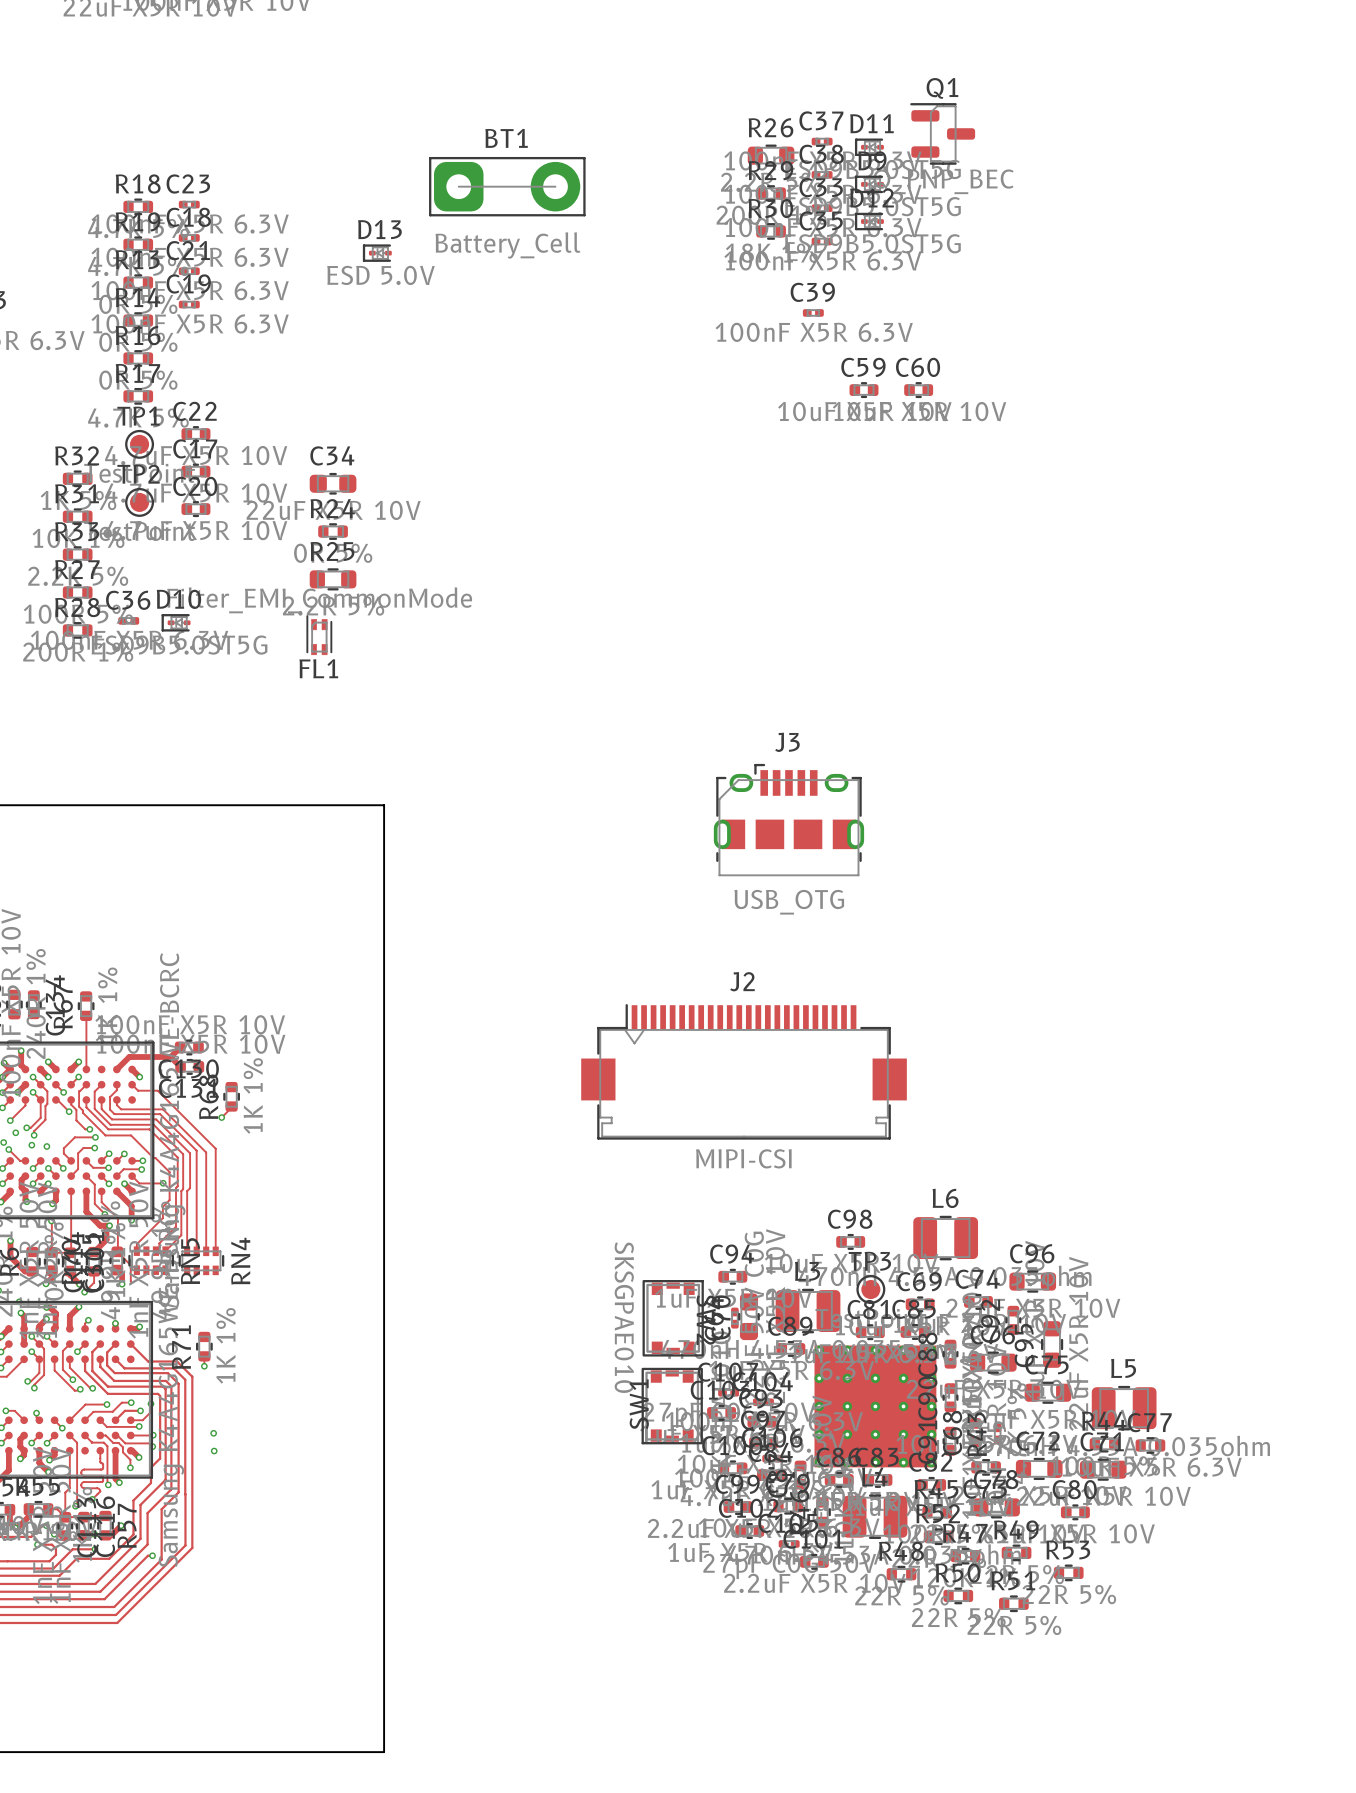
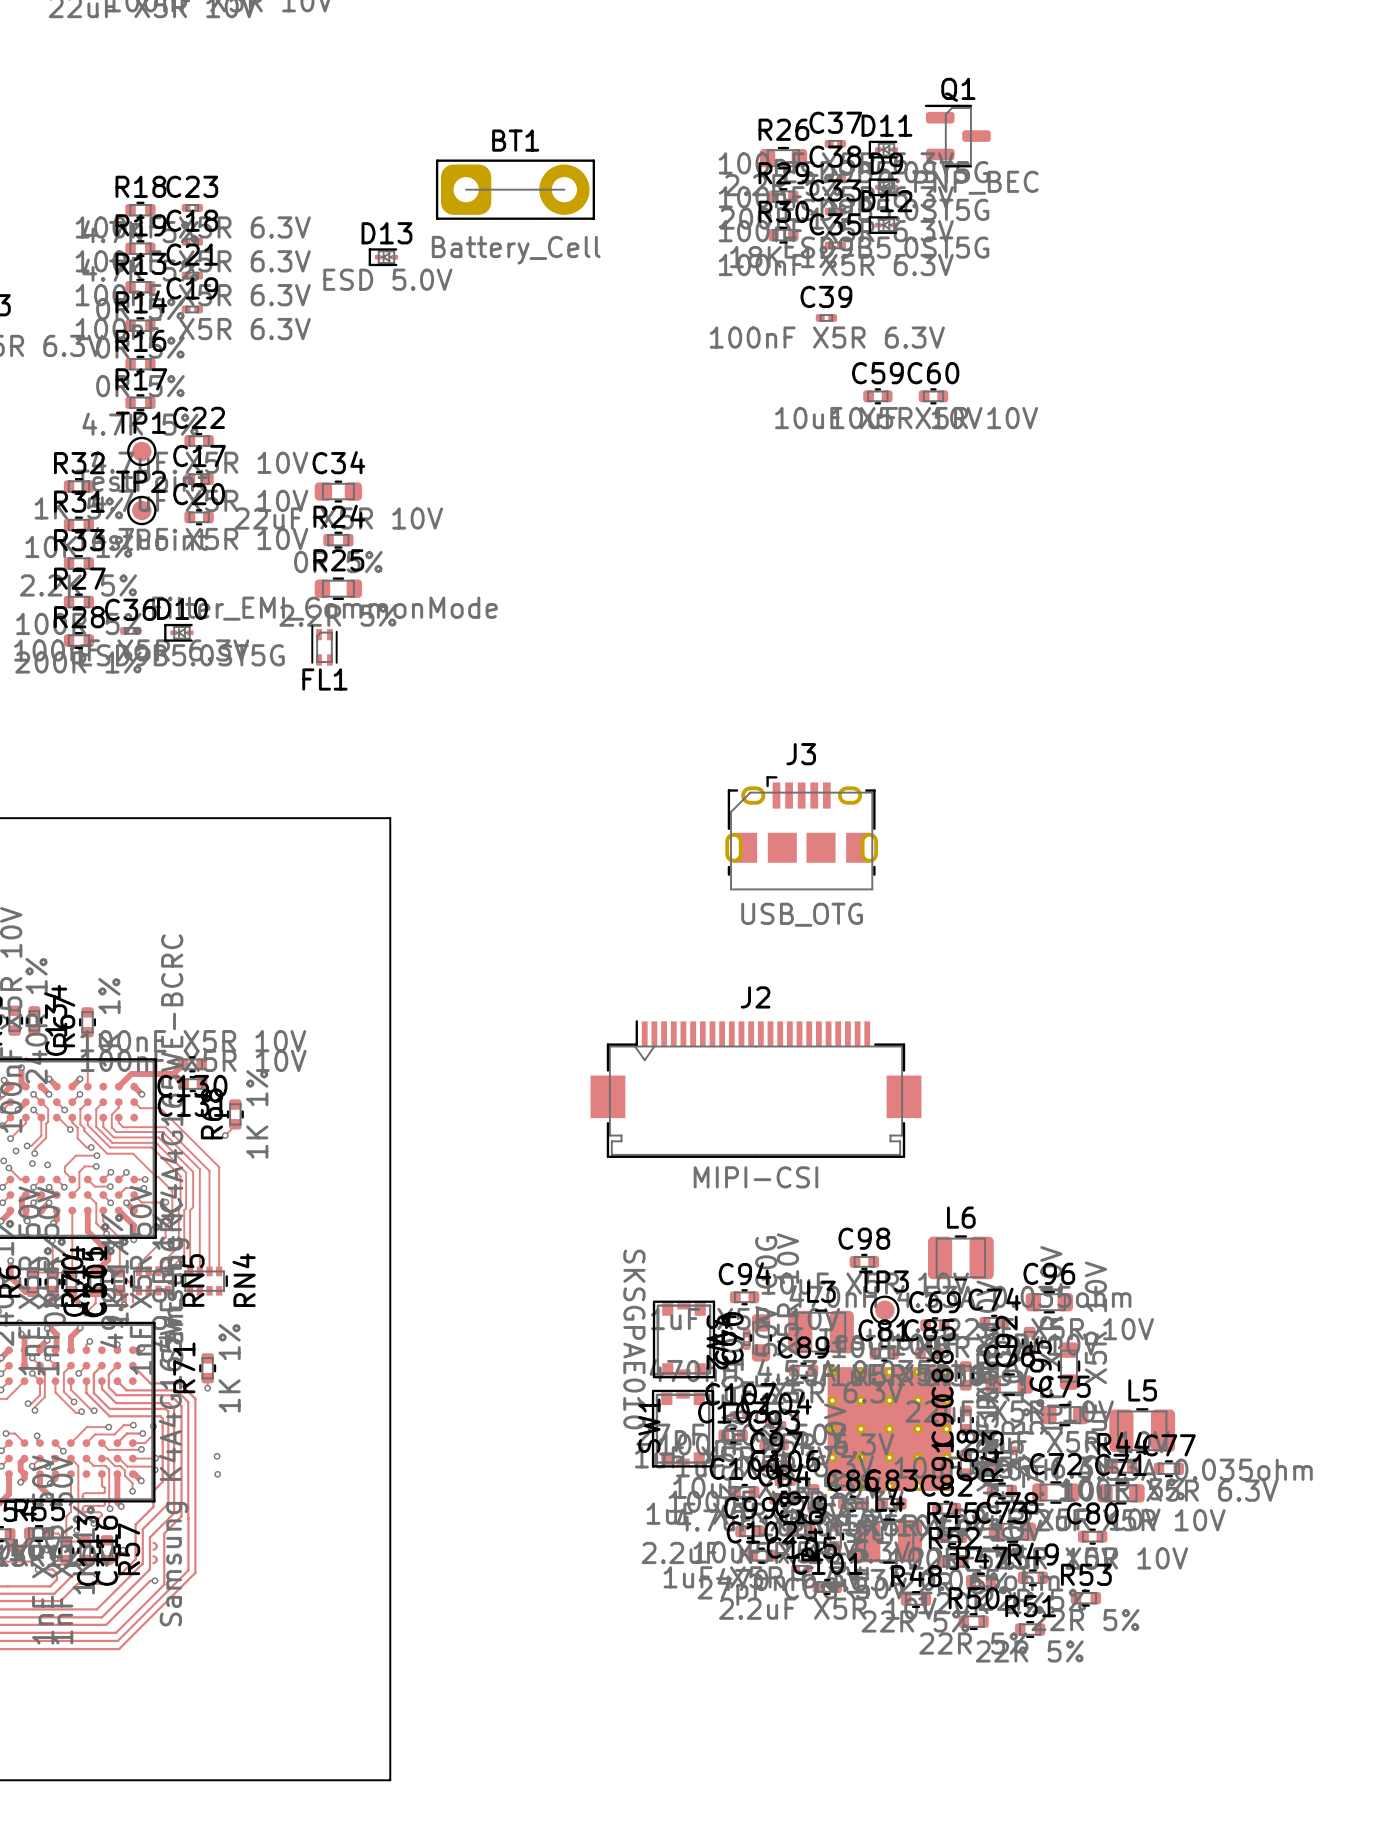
track: none -> (153, 1542) (156, 1546) (153, 1549)
track: none -> (153, 1556) (156, 1559) (153, 1563)

